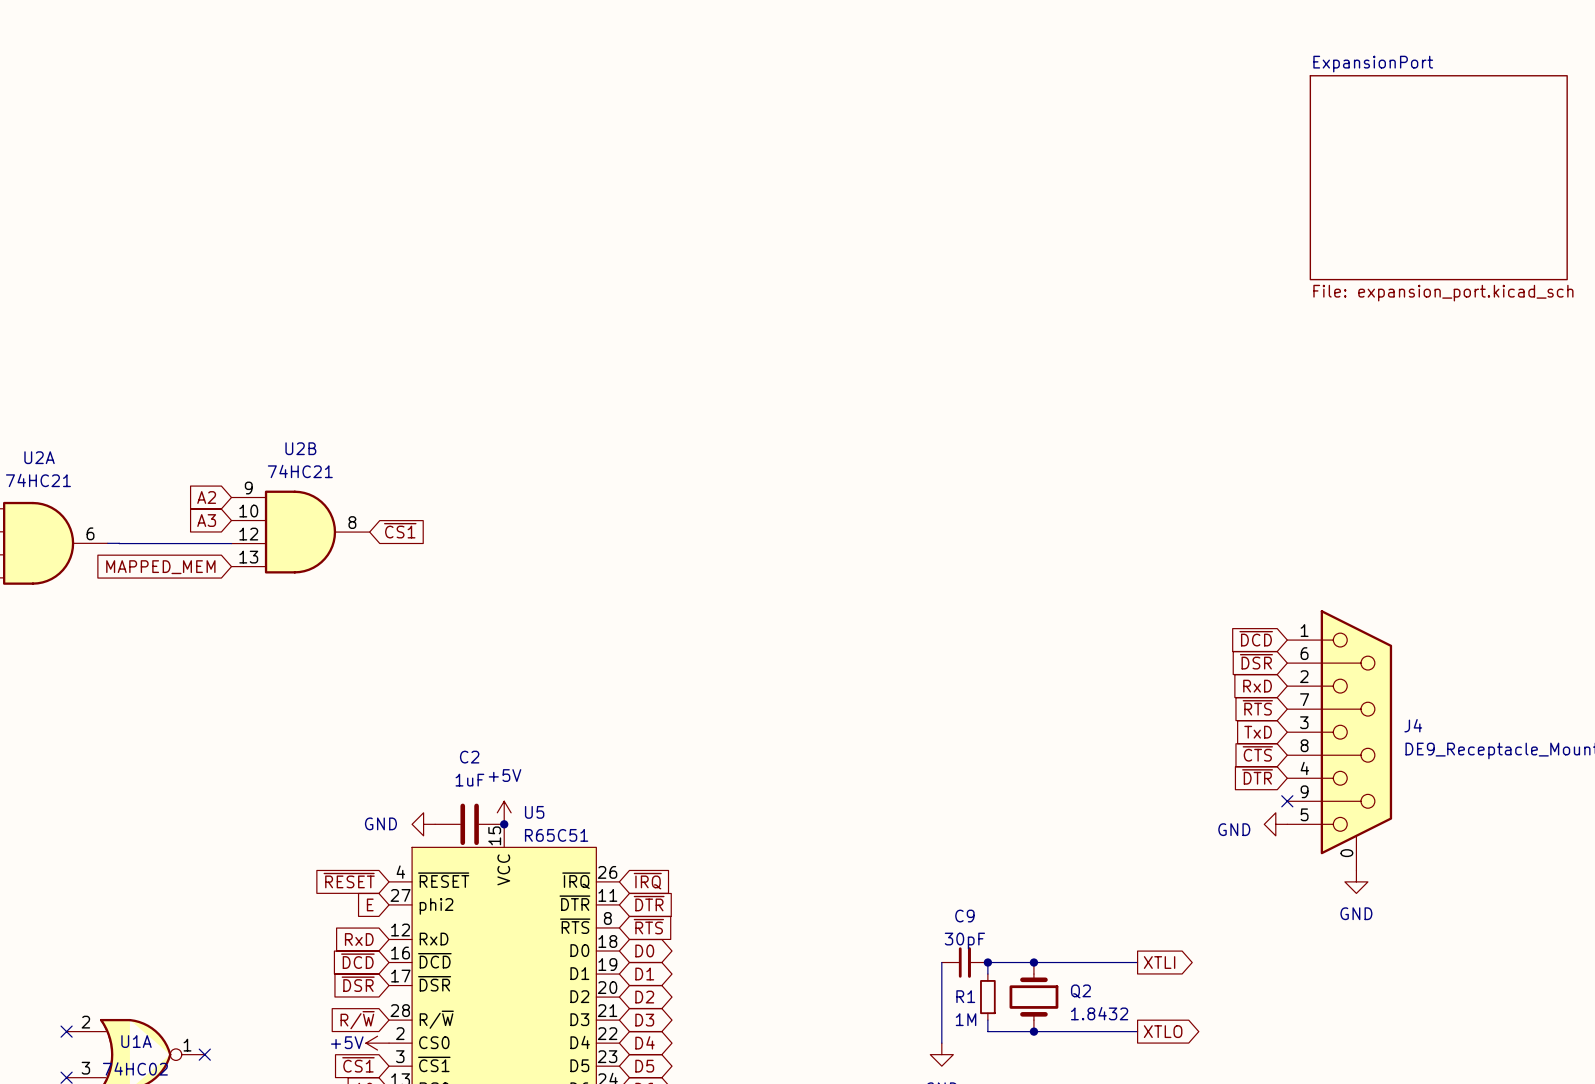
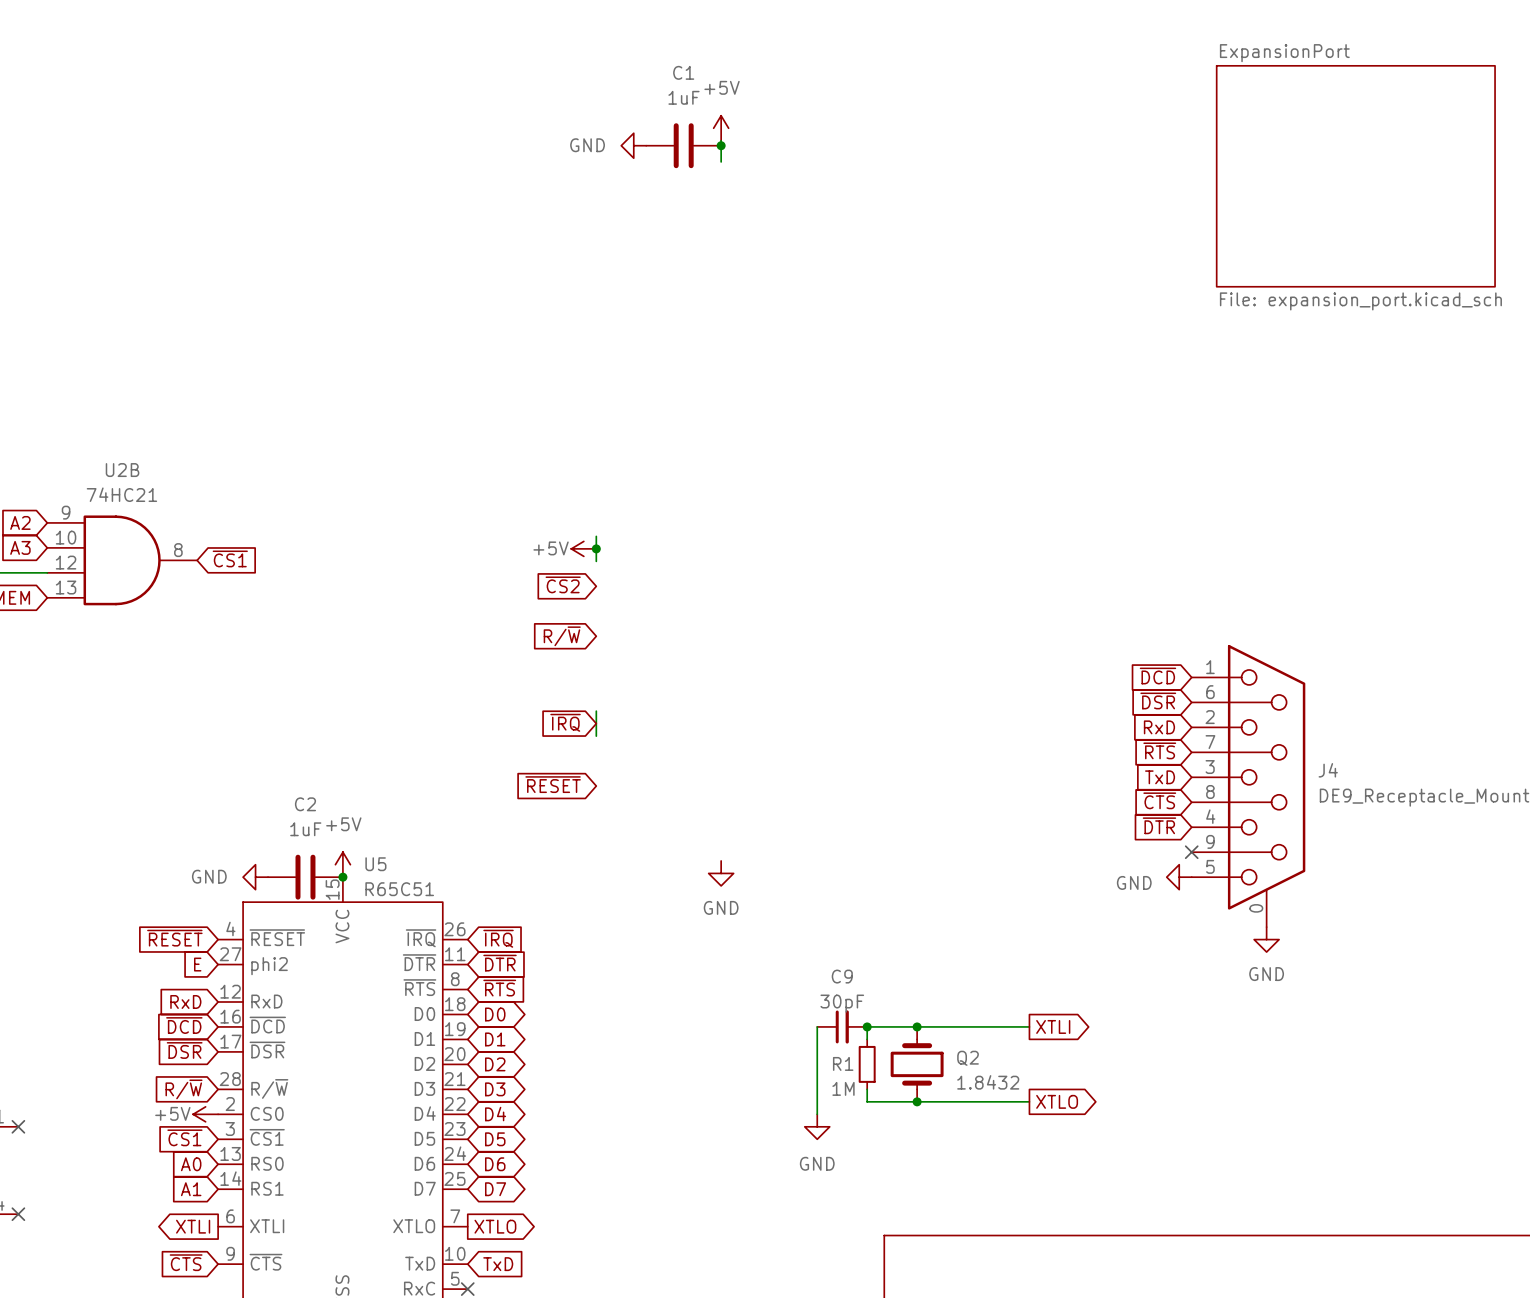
power symbol: none -> +5V (721, 128)
wire: none -> (721, 140) (721, 161)
power symbol: none -> GND (633, 145)
C1: none -> 1uF (683, 145)
junction: none -> (721, 145)
wire: none -> (596, 536) (596, 561)
power symbol: none -> +5V (583, 548)
junction: none -> (596, 548)
global label: none -> ~{CS2} (563, 584)
global label: none -> R/~{W} (562, 636)
wire: none -> (596, 711) (596, 736)
global label: none -> ~{IRQ} (565, 722)
global label: none -> ~{RESET} (553, 784)
power symbol: none -> GND (721, 873)

